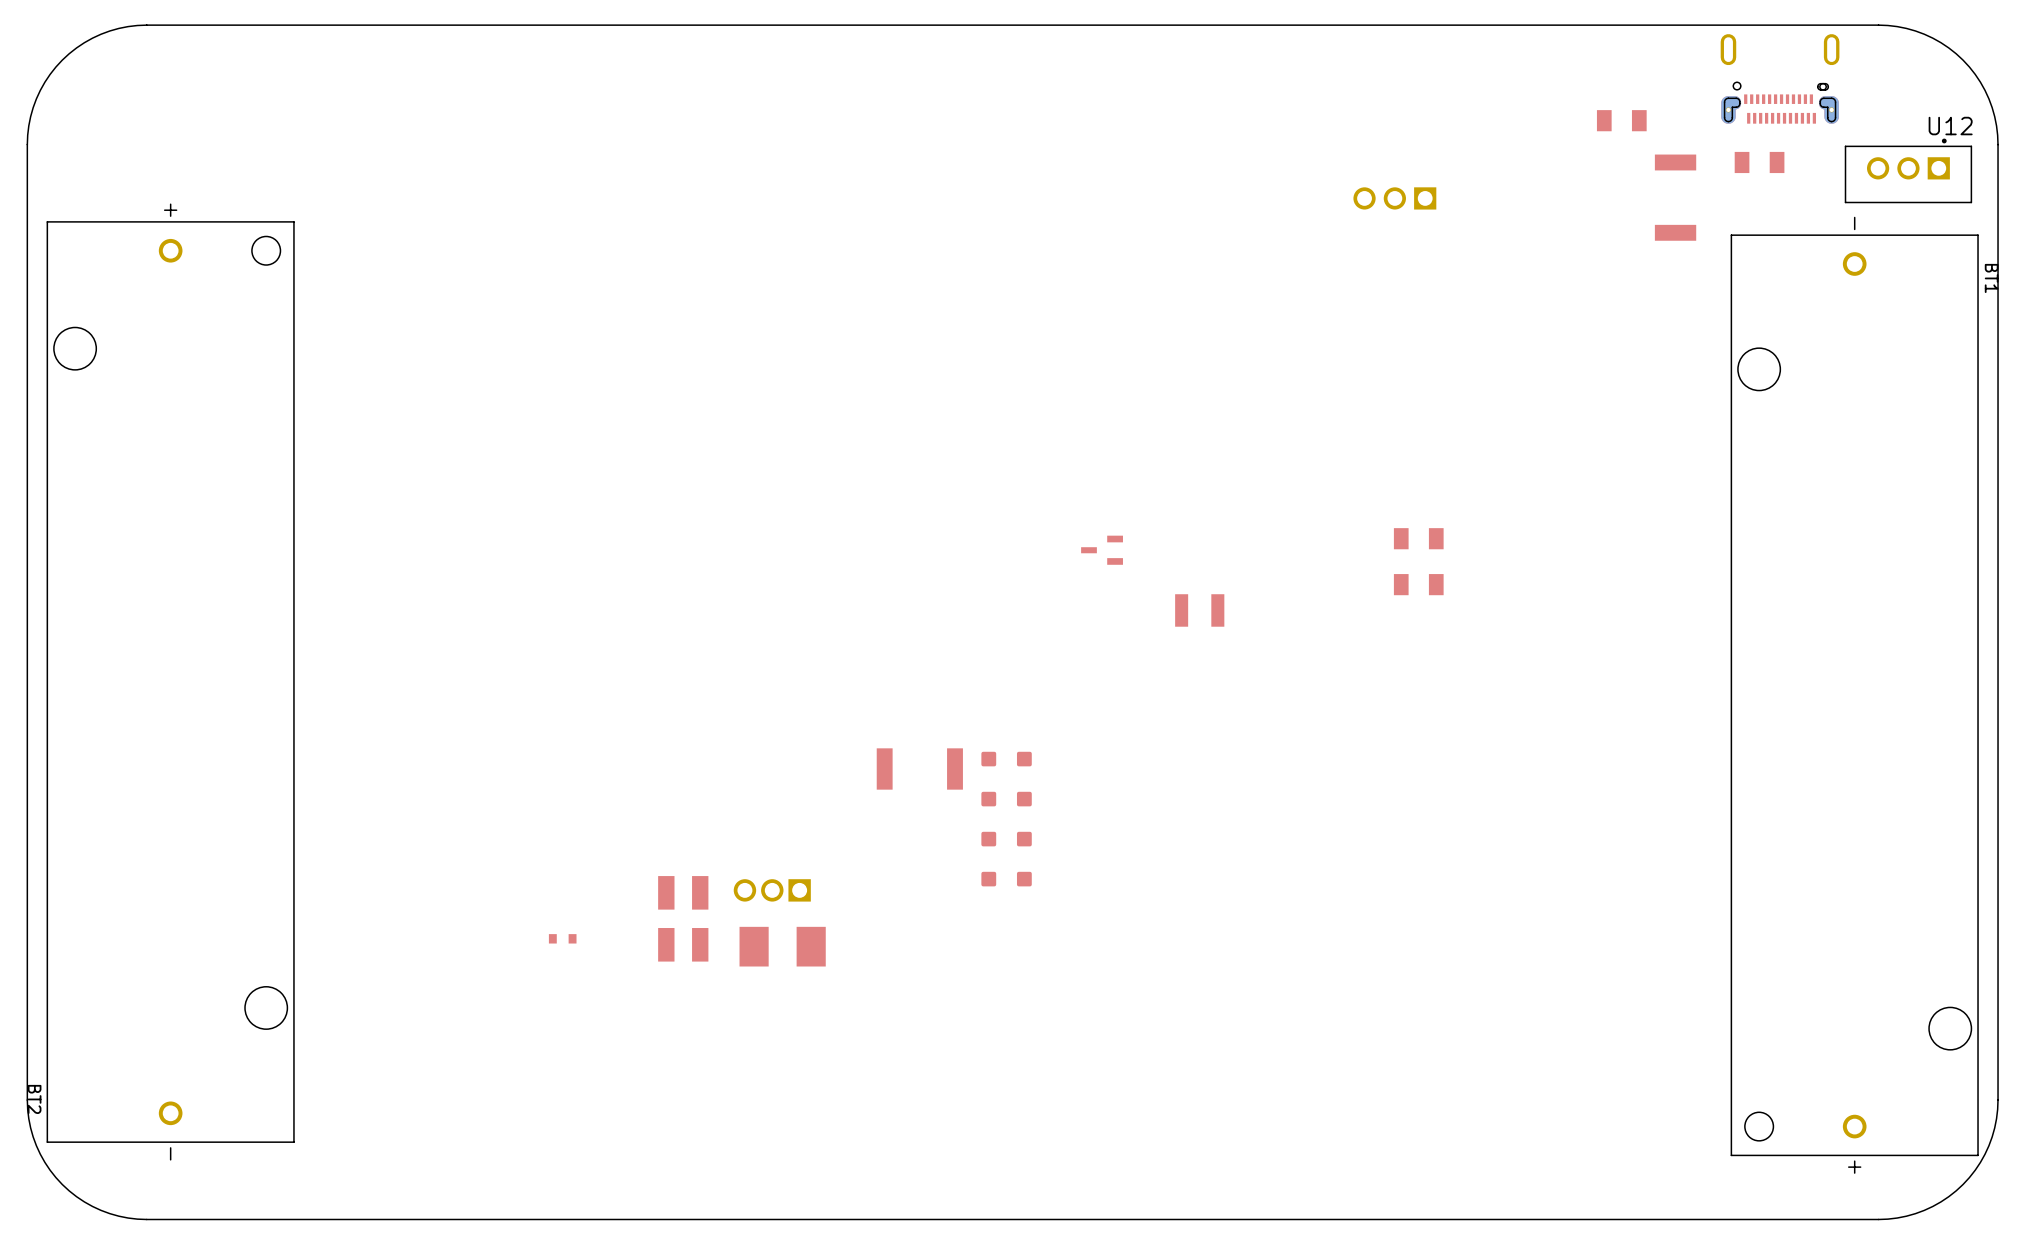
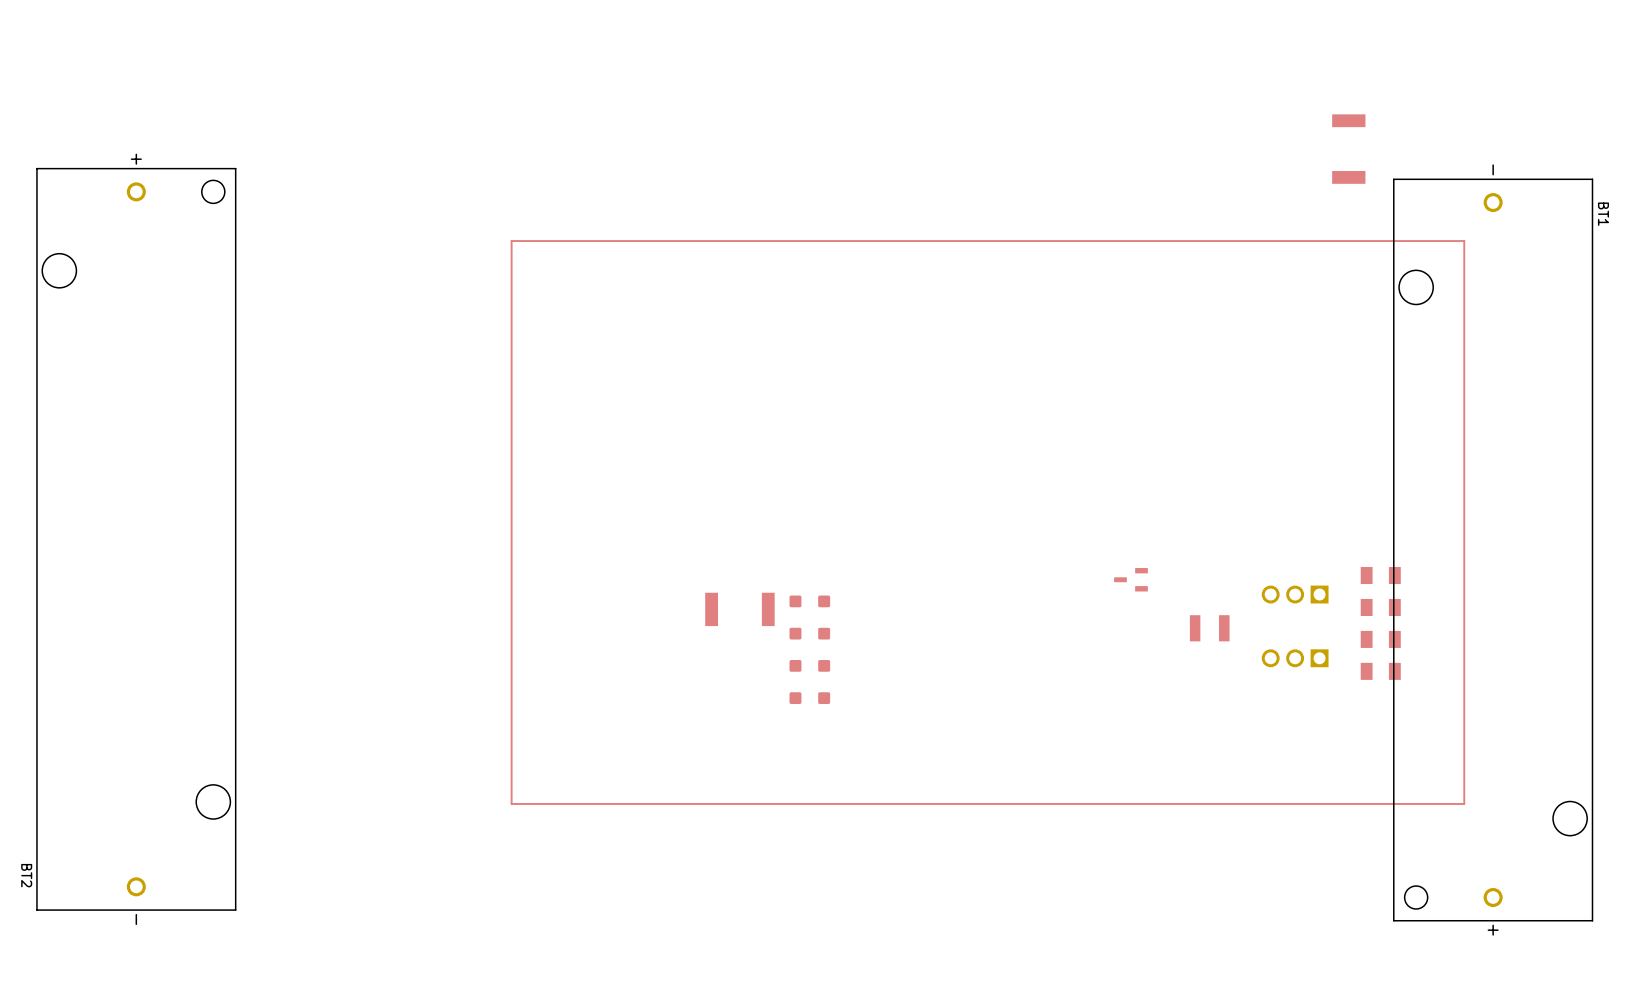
board edge: (1878, 25) (146, 25) (109, 30) (84, 42) (62, 60) (44, 82) (33, 107) (27, 144) (27, 1100) (30, 1127) (44, 1162) (62, 1184) (84, 1201) (109, 1213) (146, 1219) (1878, 1219) (1915, 1213) (1940, 1201) (1963, 1184) (1980, 1162) (1992, 1136) (1997, 1109) (1997, 135) (1988, 98) (1980, 82) (1963, 60) (1948, 47) (1924, 34) (1906, 28) (1878, 25) -> none
part: (1780, 78) -> none
part: (1621, 120) -> none
part: (1759, 162) -> none
U12: (1908, 170) -> none
part: (1394, 198) -> none
top track: none -> (1464, 241) (511, 241) (511, 803) (1464, 803) (1464, 241)
part: (1418, 538) -> none
part: (1102, 550) -> none
part: (1418, 584) -> none
part: (1199, 610) -> none
part: none -> (1380, 575)
part: none -> (1130, 579)
part: none -> (1295, 594)
part: none -> (1380, 607)
part: none -> (1209, 628)
part: none -> (1380, 639)
part: none -> (1295, 658)
part: none -> (1380, 671)
part: (772, 890) -> none
part: (683, 892) -> none
part: (562, 938) -> none
part: (683, 944) -> none
part: (782, 946) -> none

